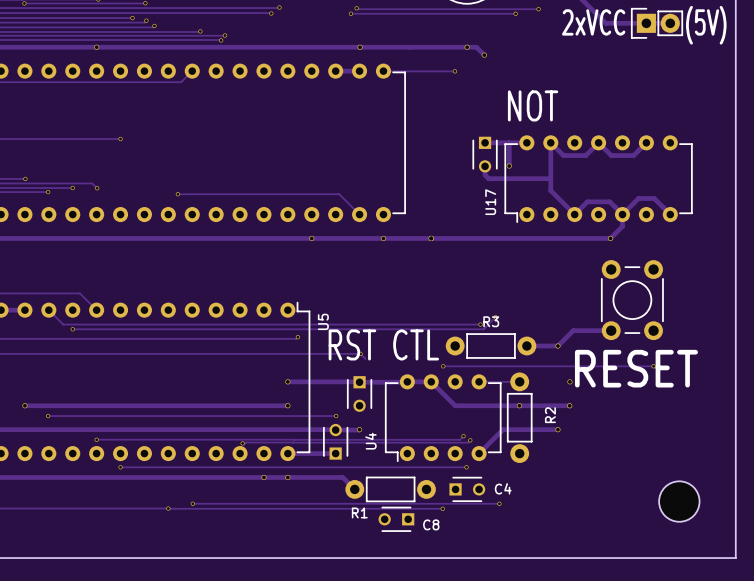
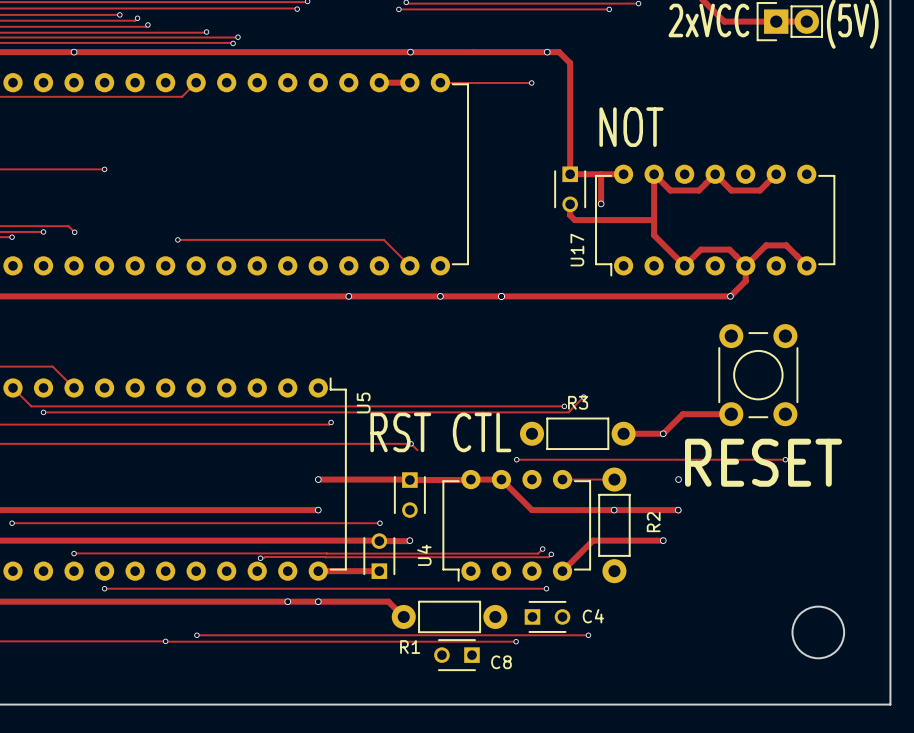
track: none -> (569, 62) (570, 174)
via: (484, 55) -> none

